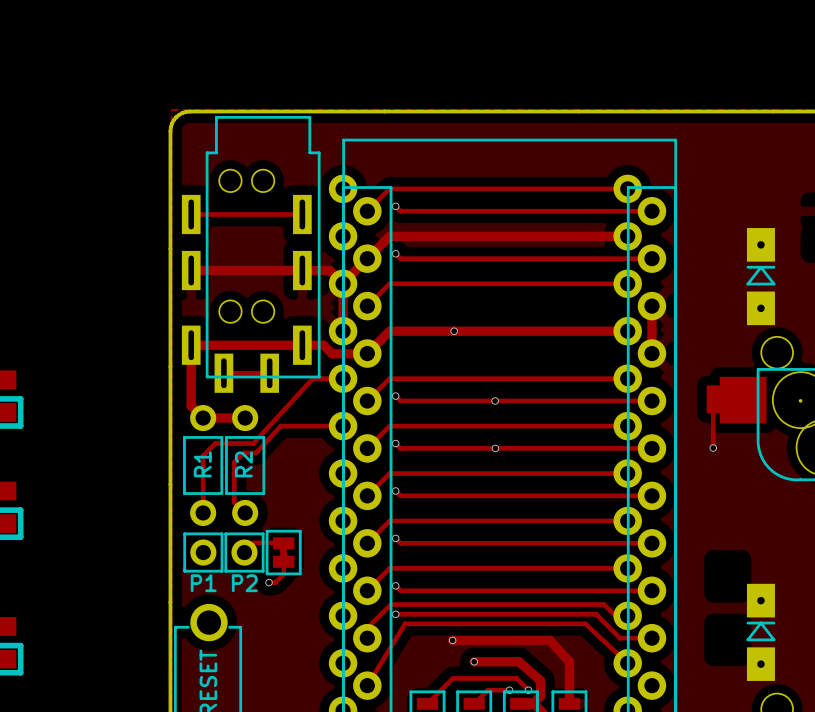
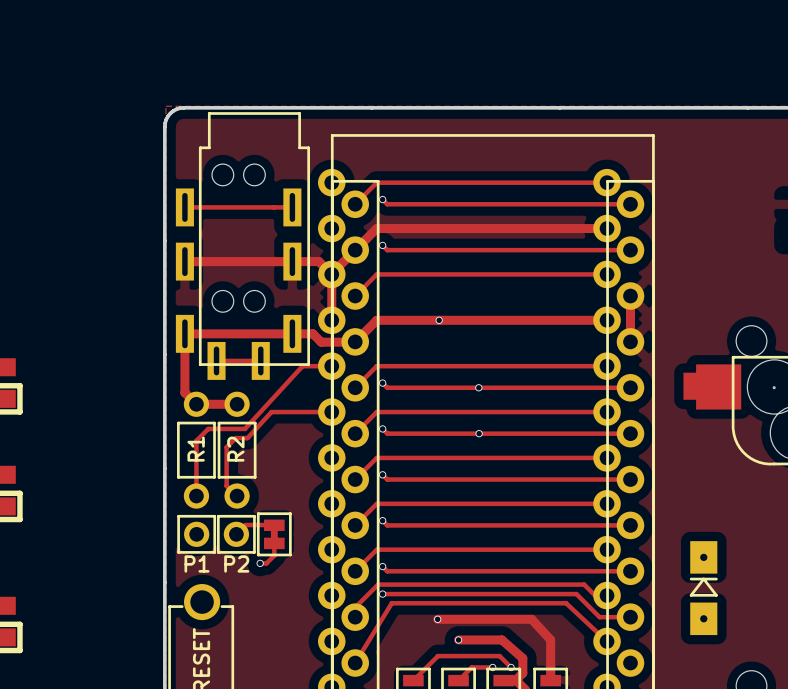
part: (760, 276) -> none
track: (743, 400) (713, 399) (713, 448) -> none
via: (713, 448) -> none
part position: (760, 632) -> (703, 588)

